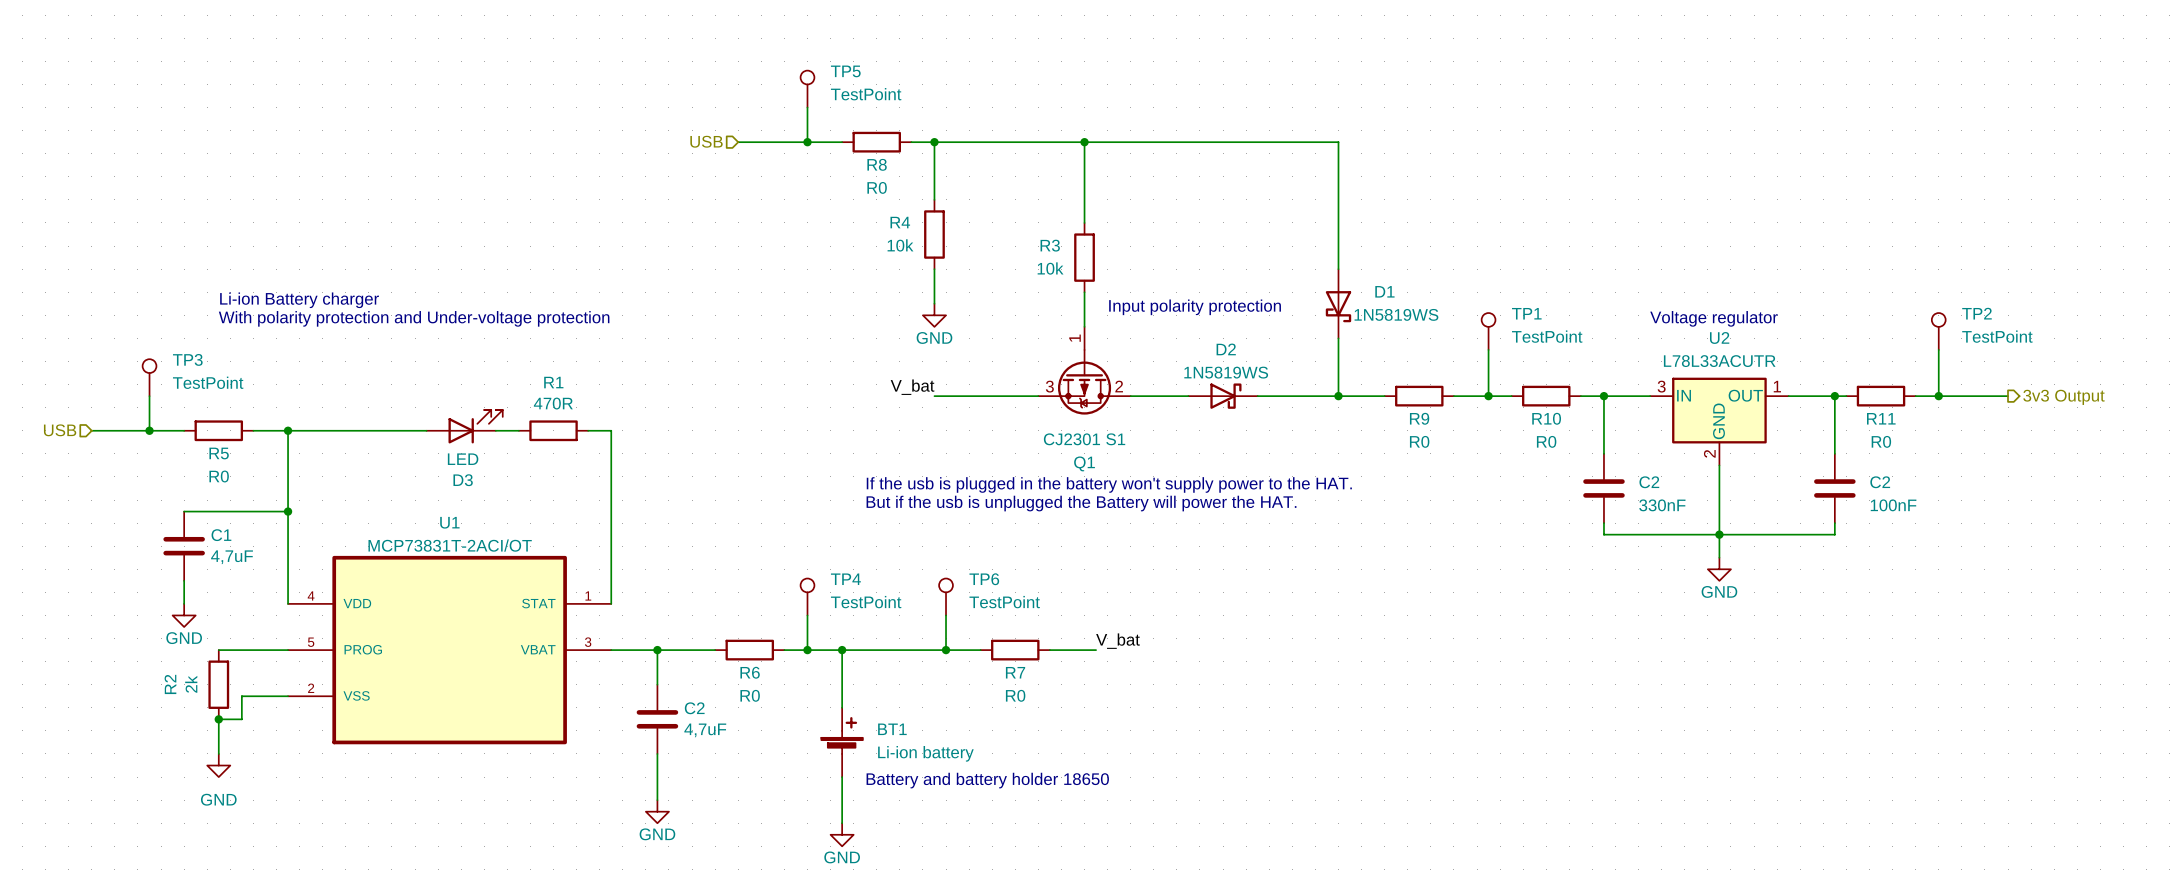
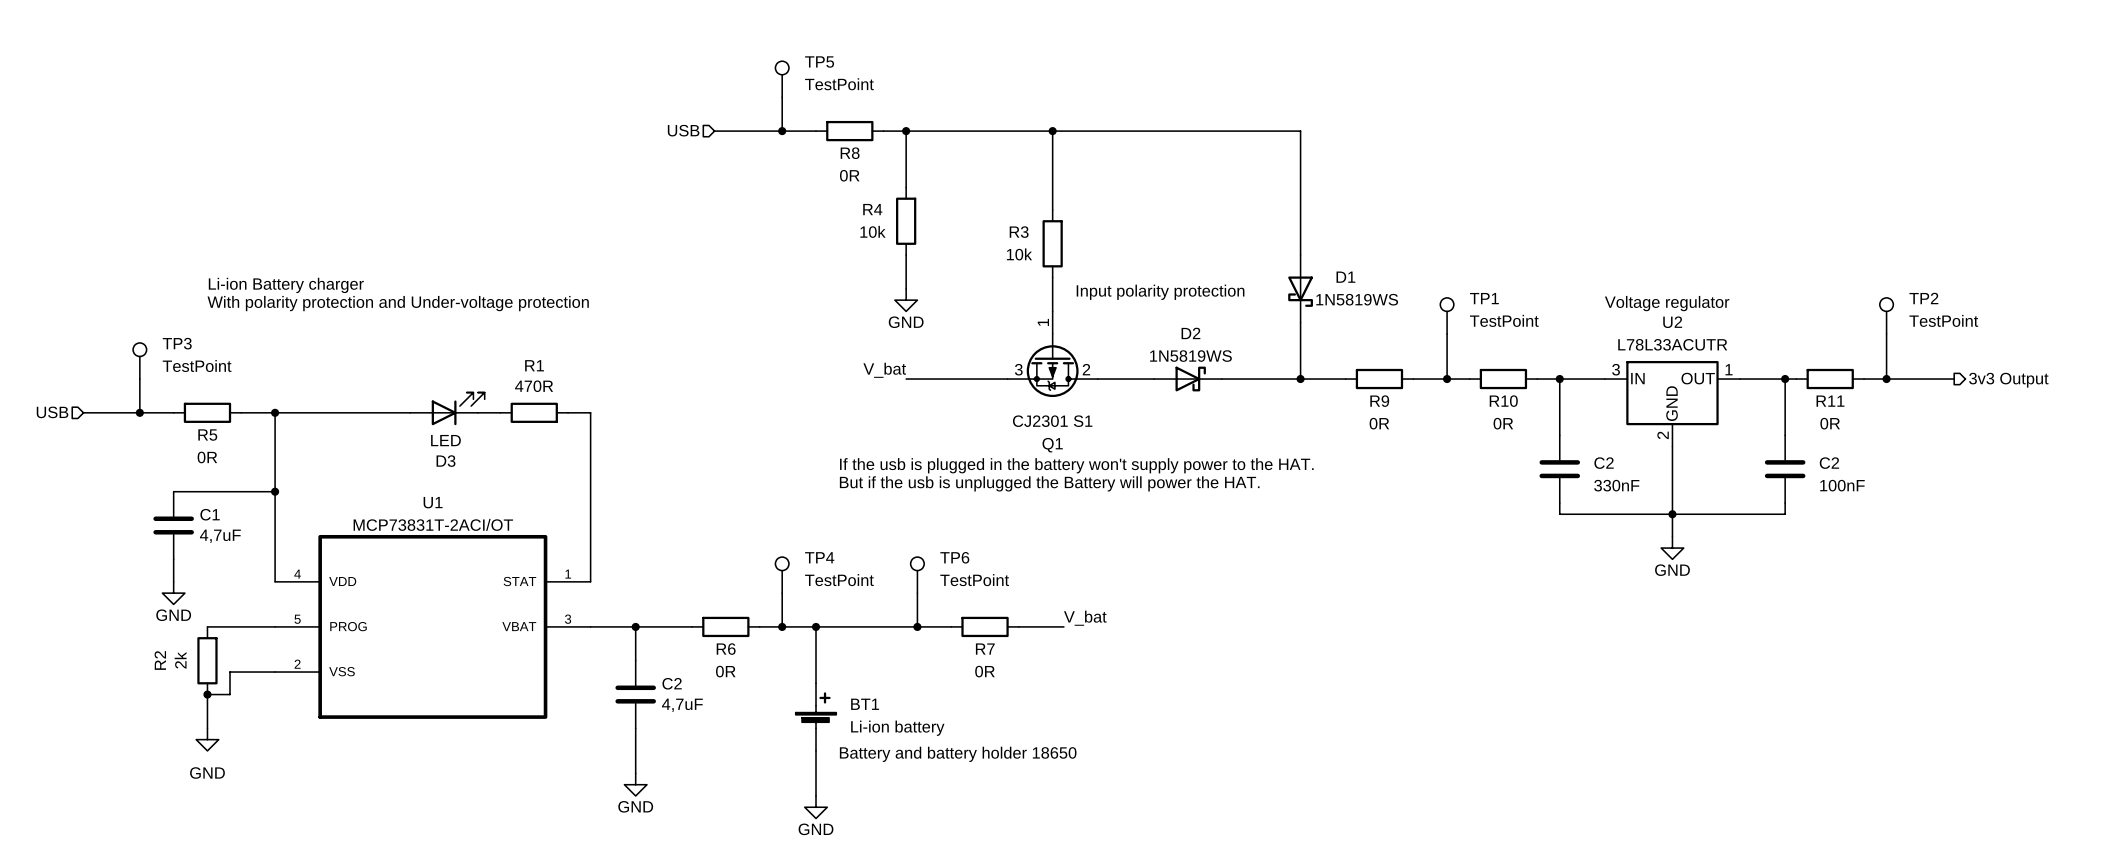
R8 value: R0 (877, 187) -> 0R (849, 175)
R9 value: R0 (1419, 441) -> 0R (1379, 423)
R10 value: R0 (1546, 441) -> 0R (1503, 423)
R11 value: R0 (1881, 441) -> 0R (1830, 423)
R5 value: R0 (219, 476) -> 0R (207, 457)
R6 value: R0 (750, 695) -> 0R (725, 671)
R7 value: R0 (1015, 695) -> 0R (984, 671)

